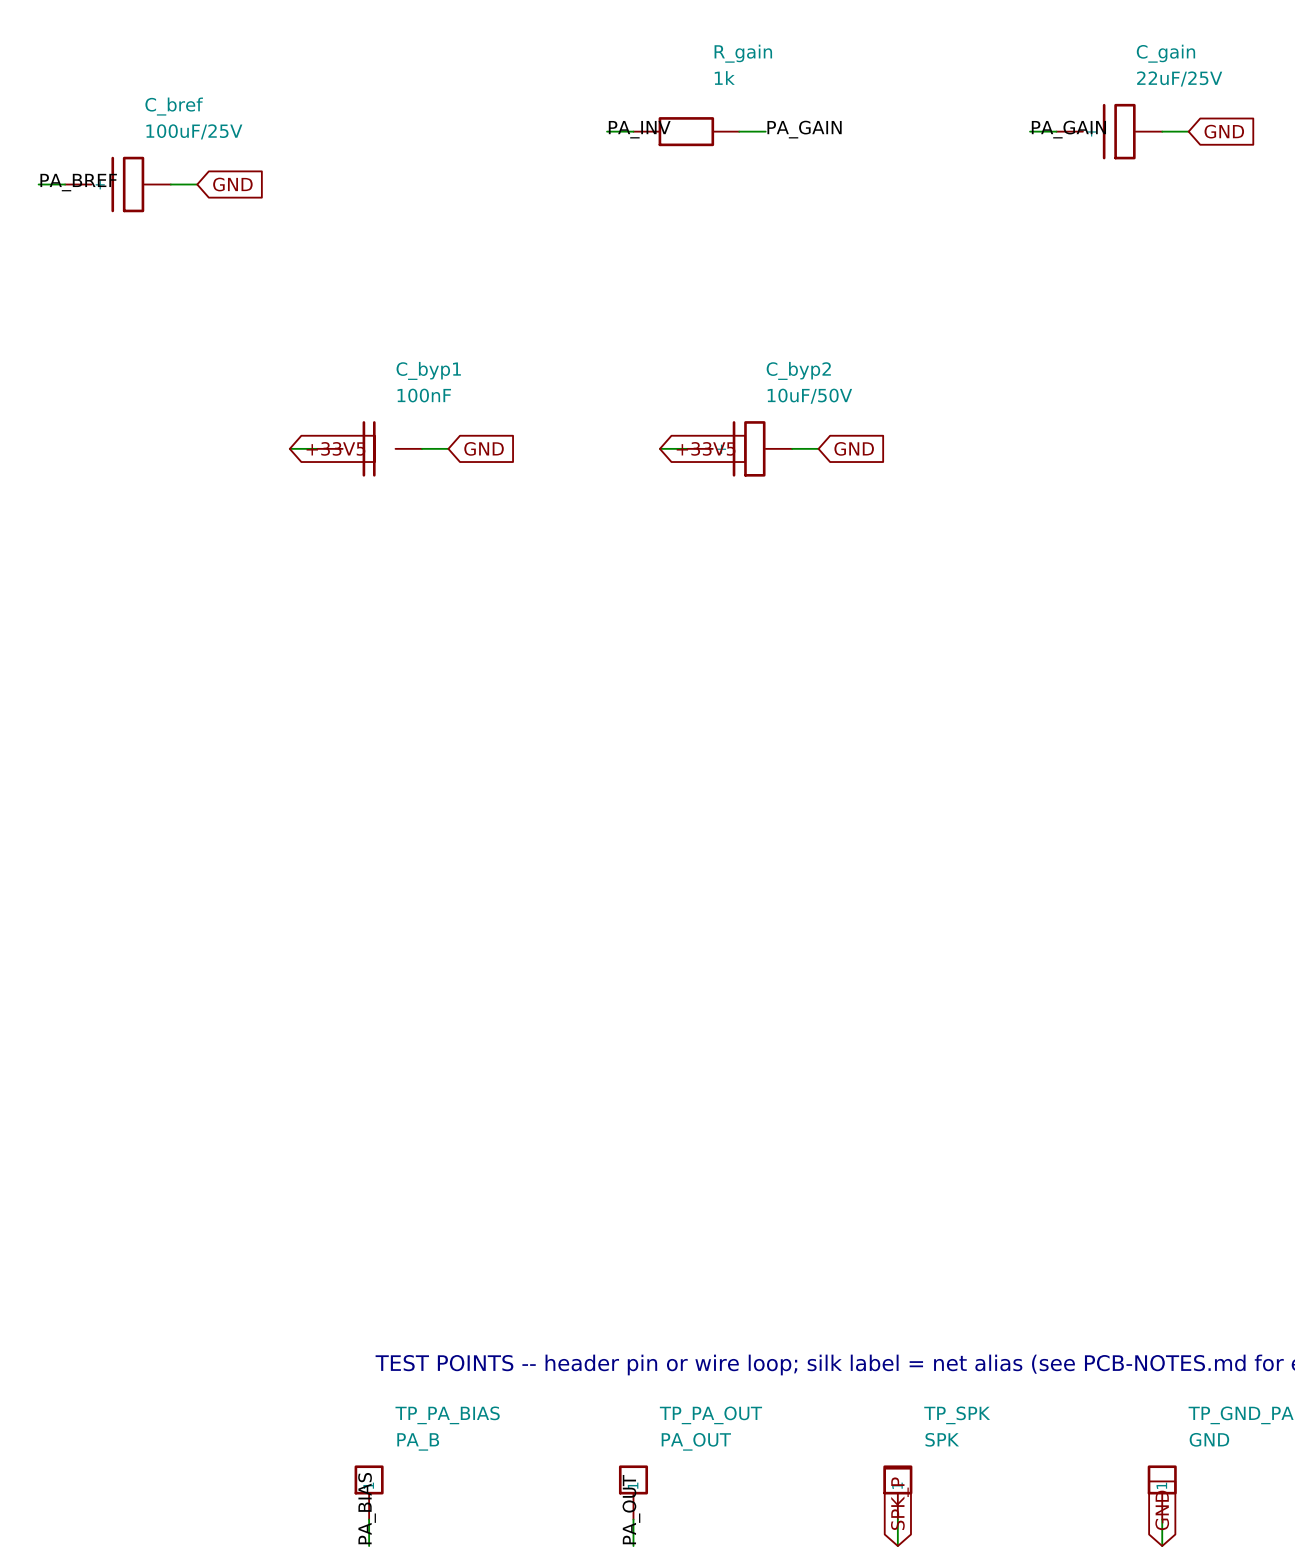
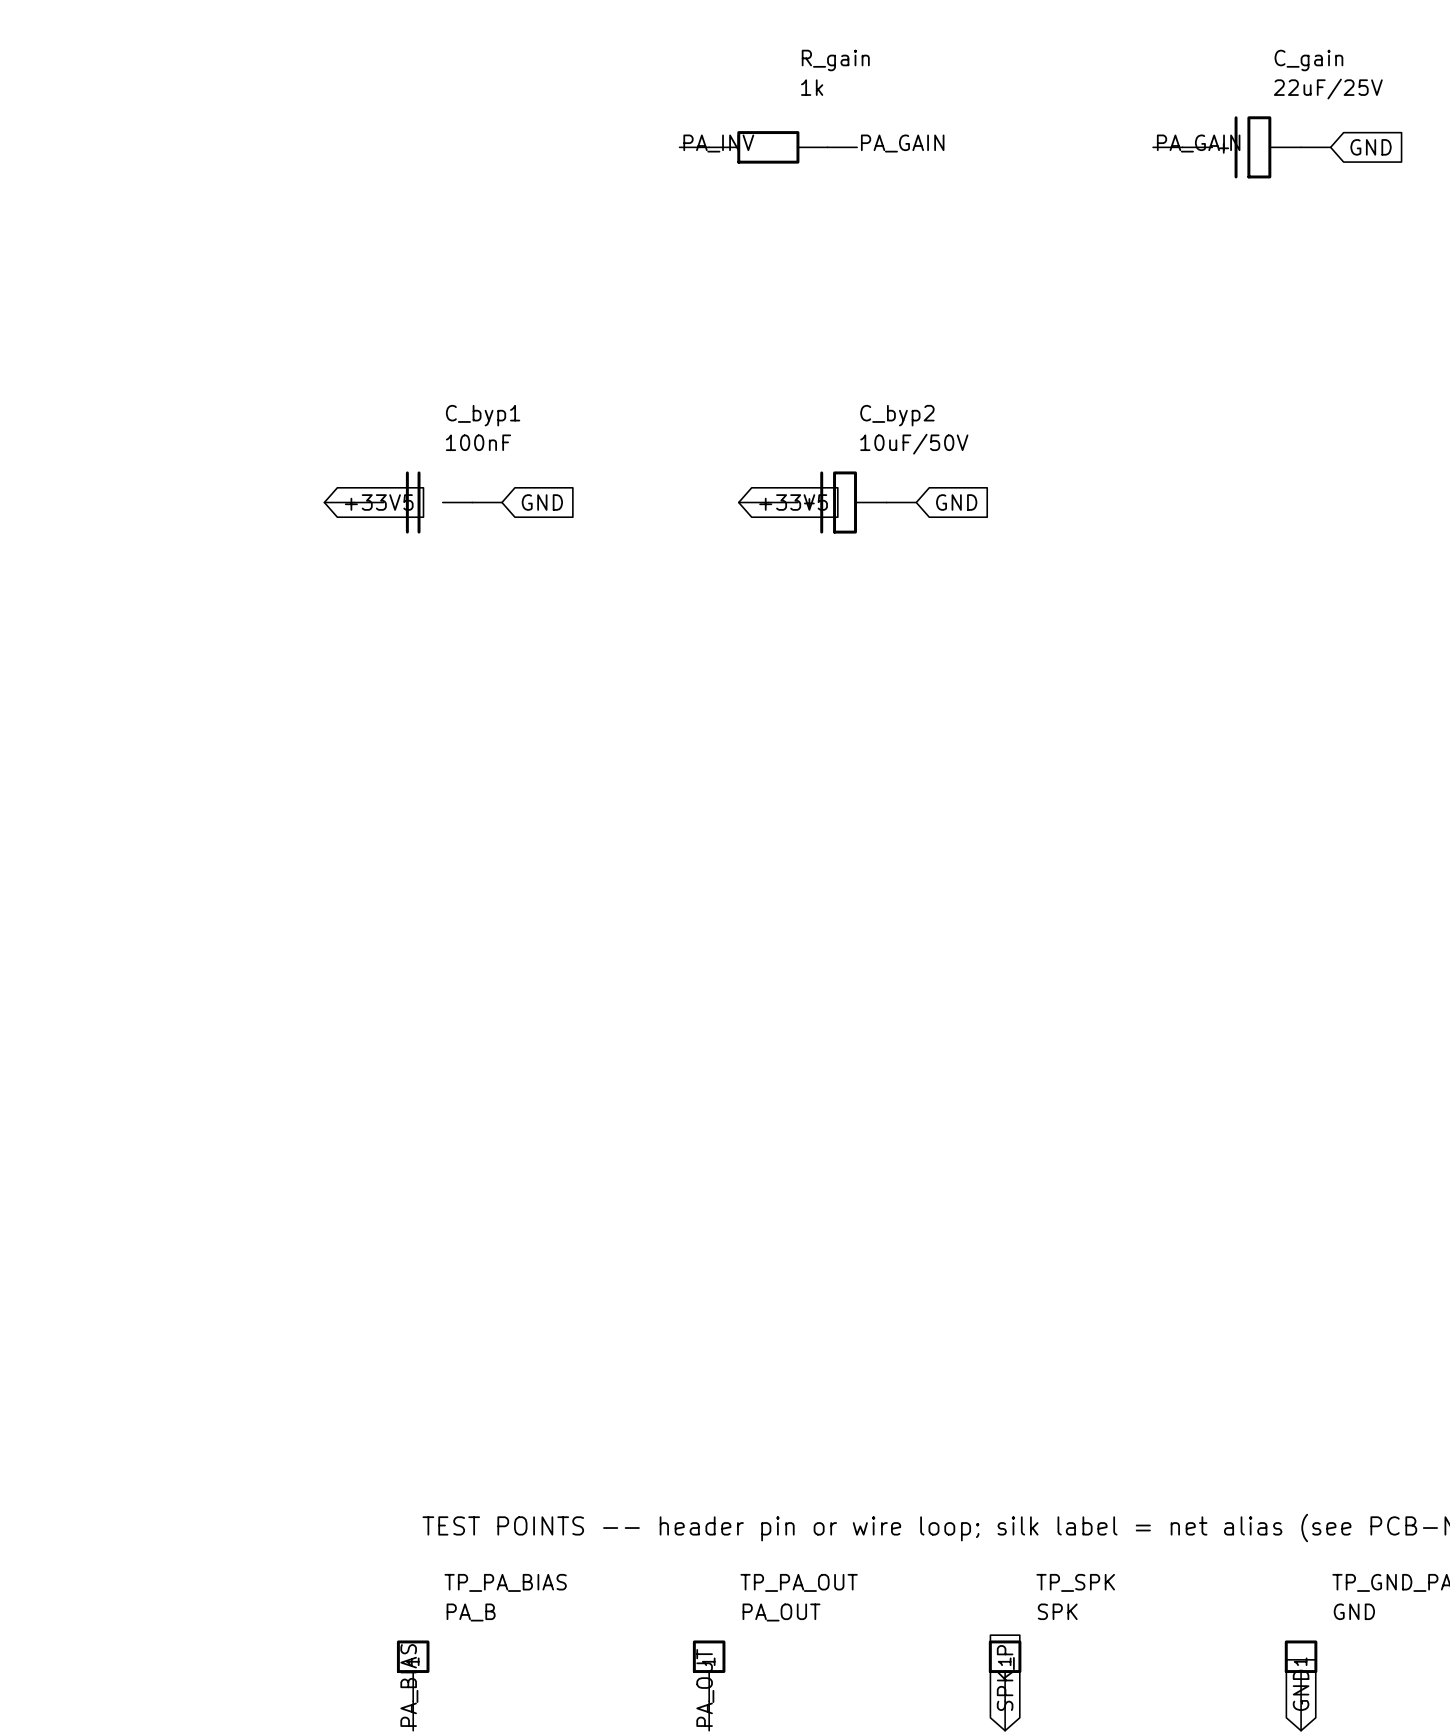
label: PA_BREF (78, 182) -> none
wire: (38, 184) (65, 184) -> none
C_bref: 100uF/25V (117, 184) -> none
wire: (170, 184) (197, 184) -> none
global label: GND (232, 184) -> none

